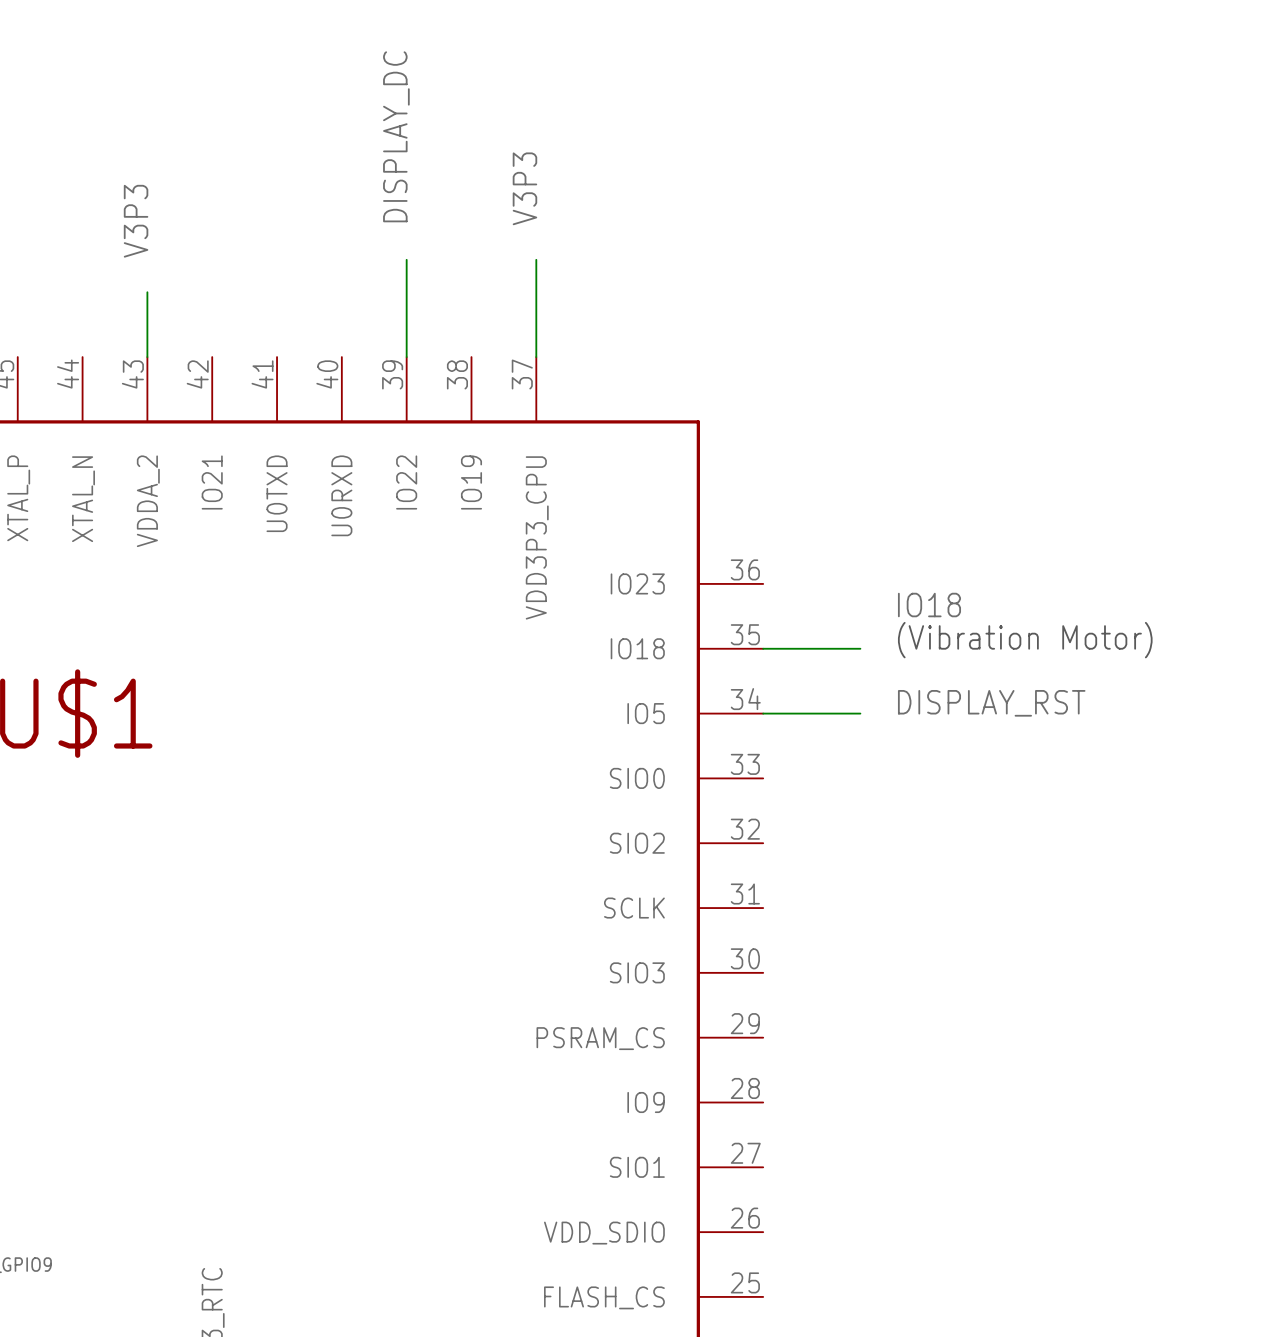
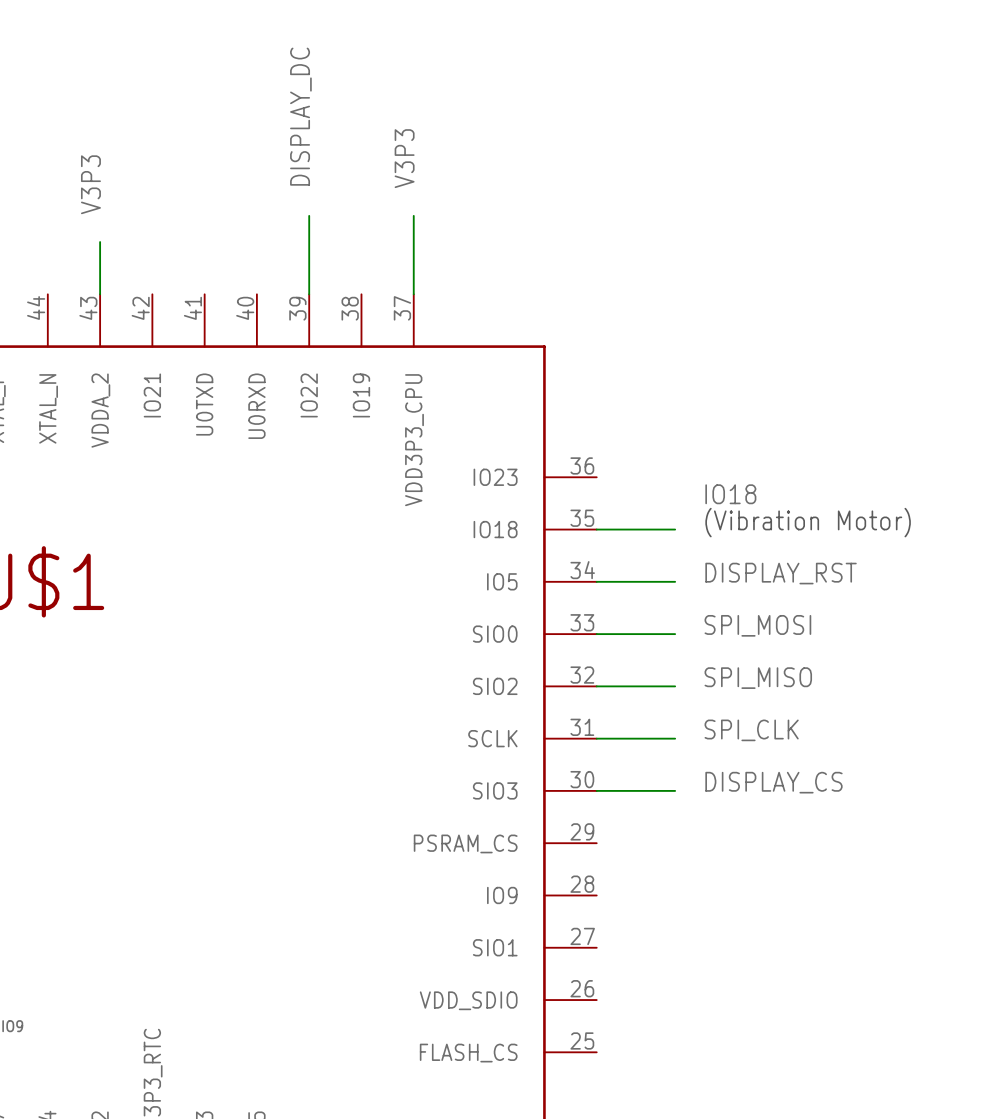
label: none -> SPI_MOSI (757, 625)
wire: none -> (596, 634) (675, 634)
label: none -> SPI_MISO (758, 678)
wire: none -> (596, 686) (675, 686)
label: none -> SPI_CLK (751, 730)
wire: none -> (596, 738) (675, 738)
label: none -> DISPLAY_CS (773, 782)
wire: none -> (596, 790) (675, 790)

